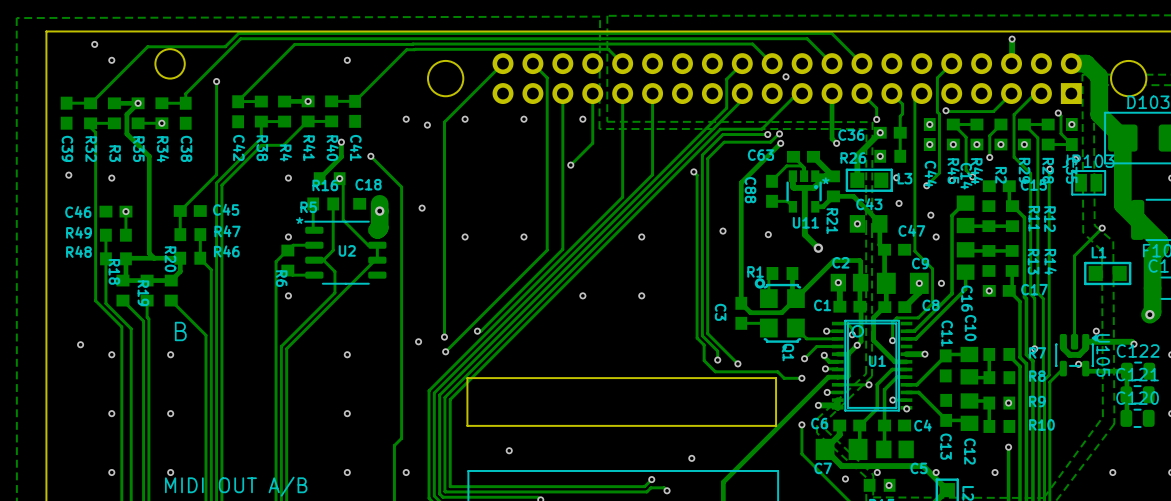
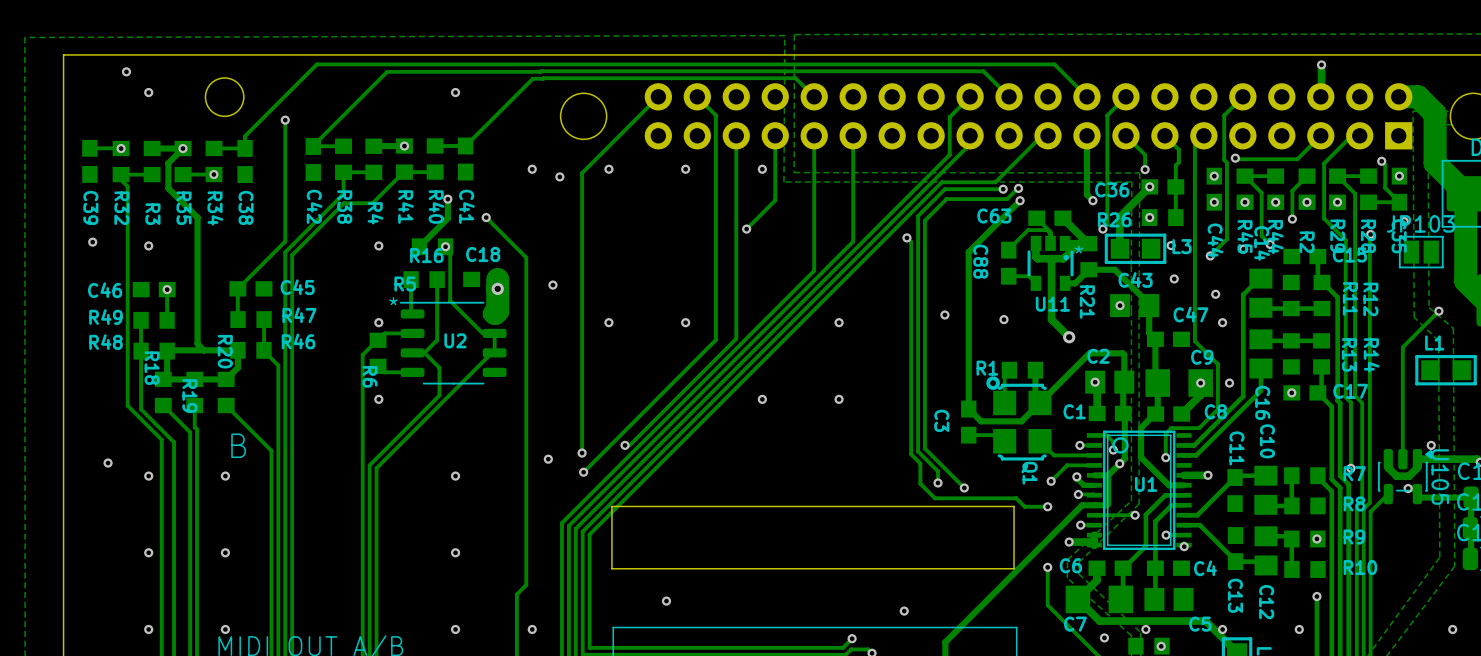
track: (861, 63) (831, 33) (238, 33) (225, 46) (147, 46) (91, 103) -> (1125, 96) (1107, 115) (1107, 224) (1102, 229)
via: (786, 76) -> none
via: none -> (121, 148)
via: none -> (1102, 229)

